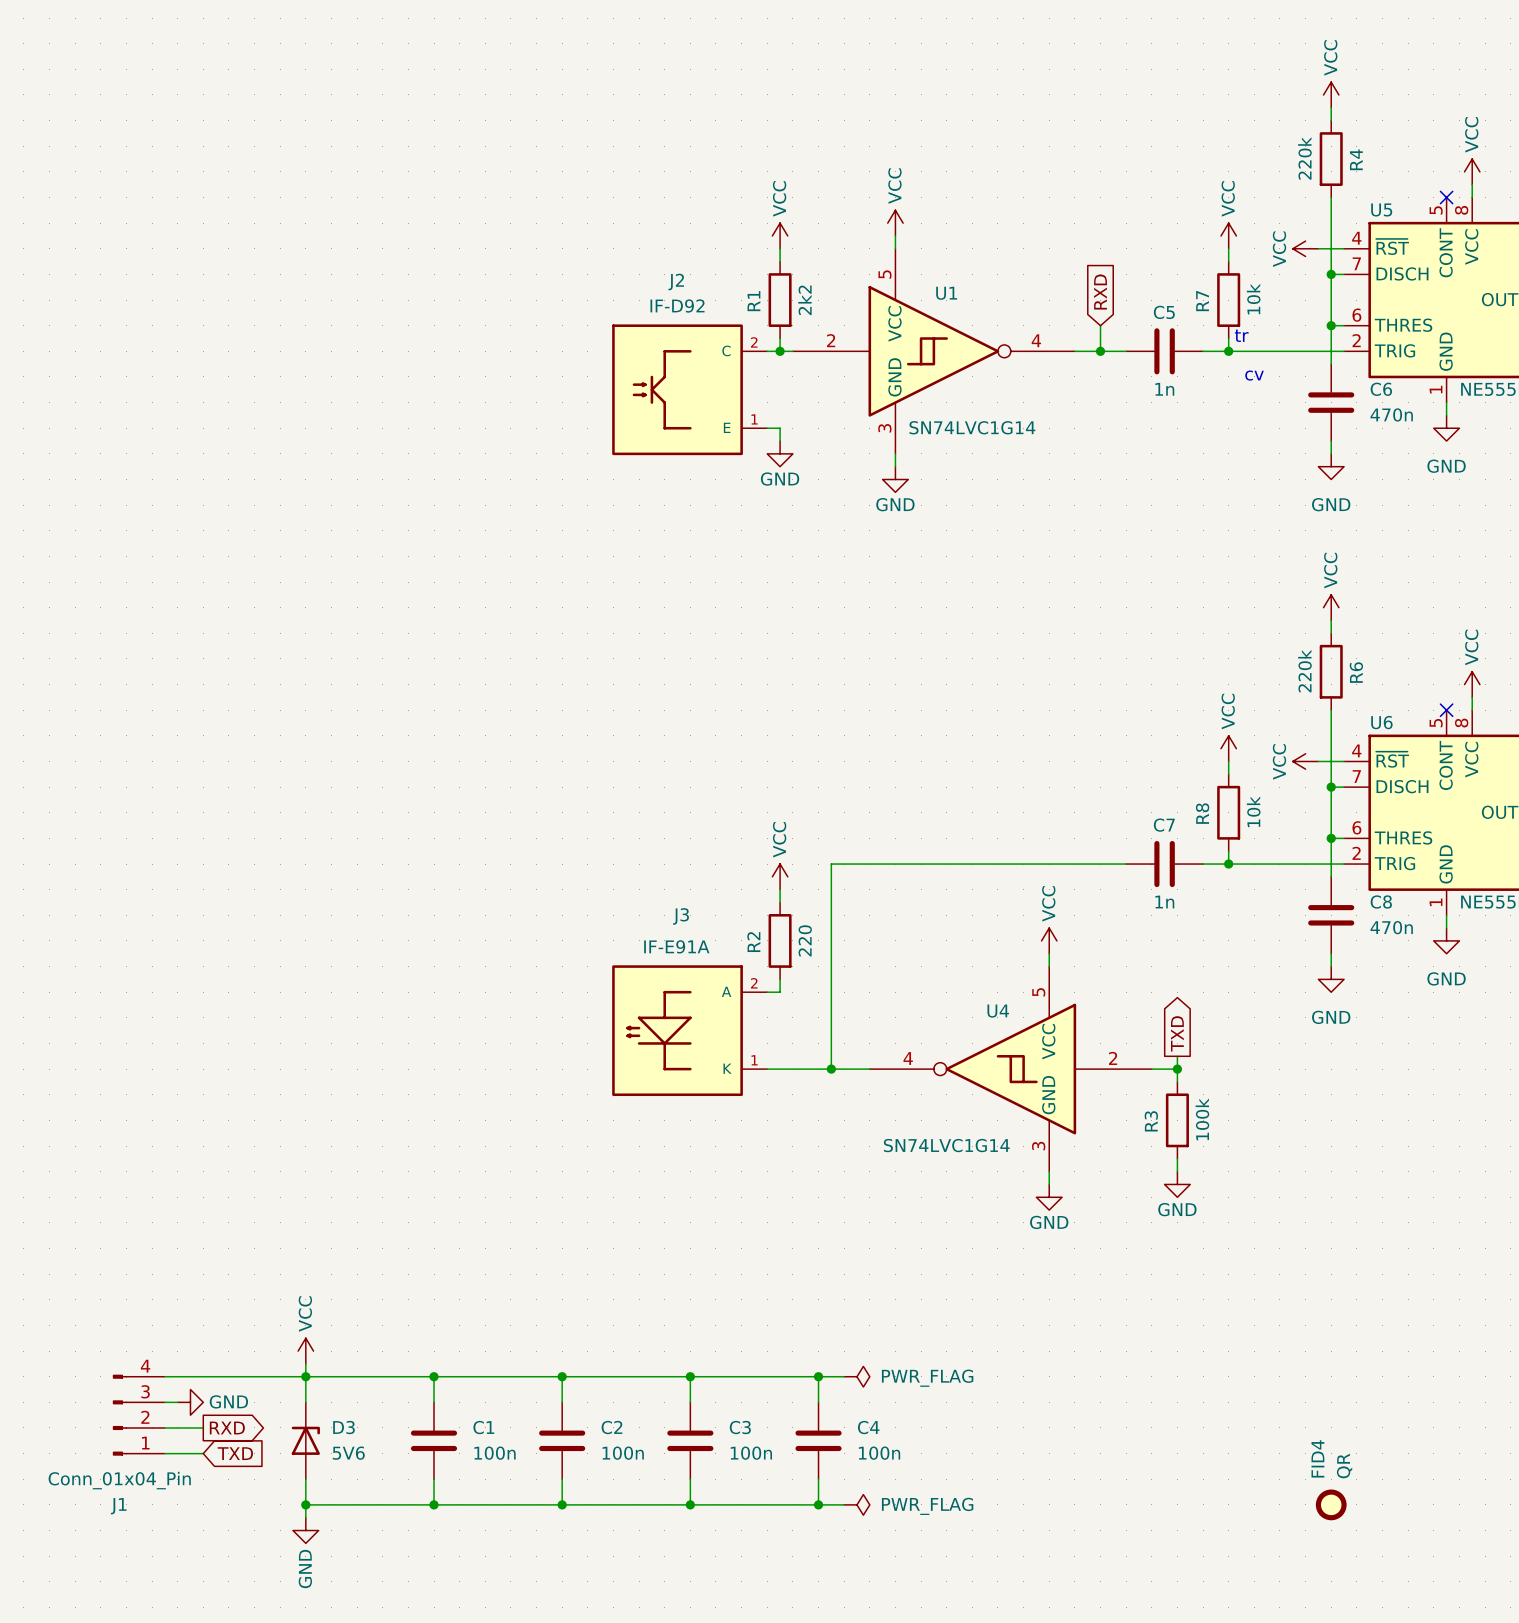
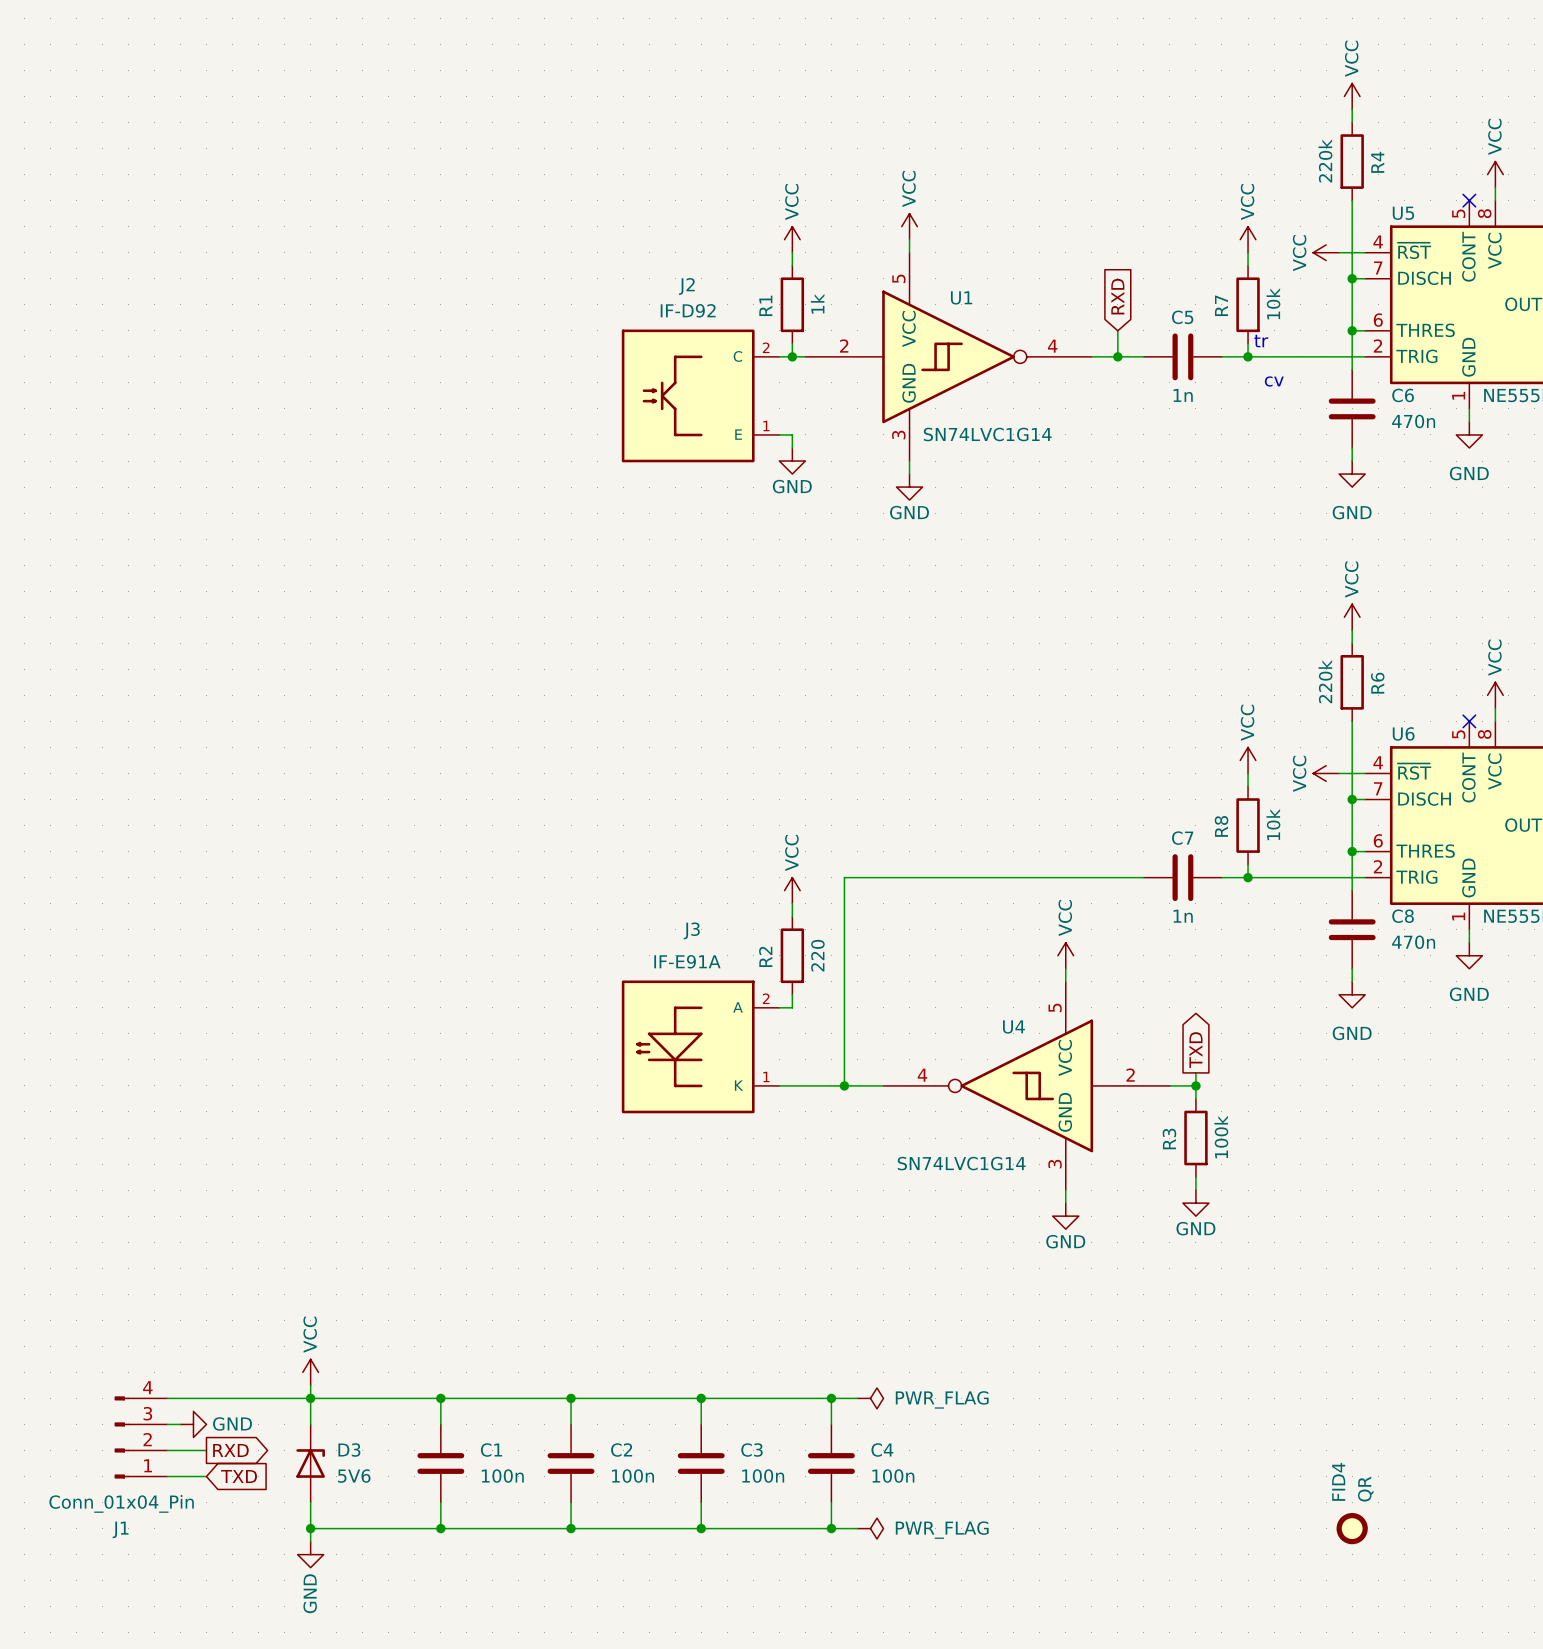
R1 value: 2k2 (804, 300) -> 1k (817, 303)

